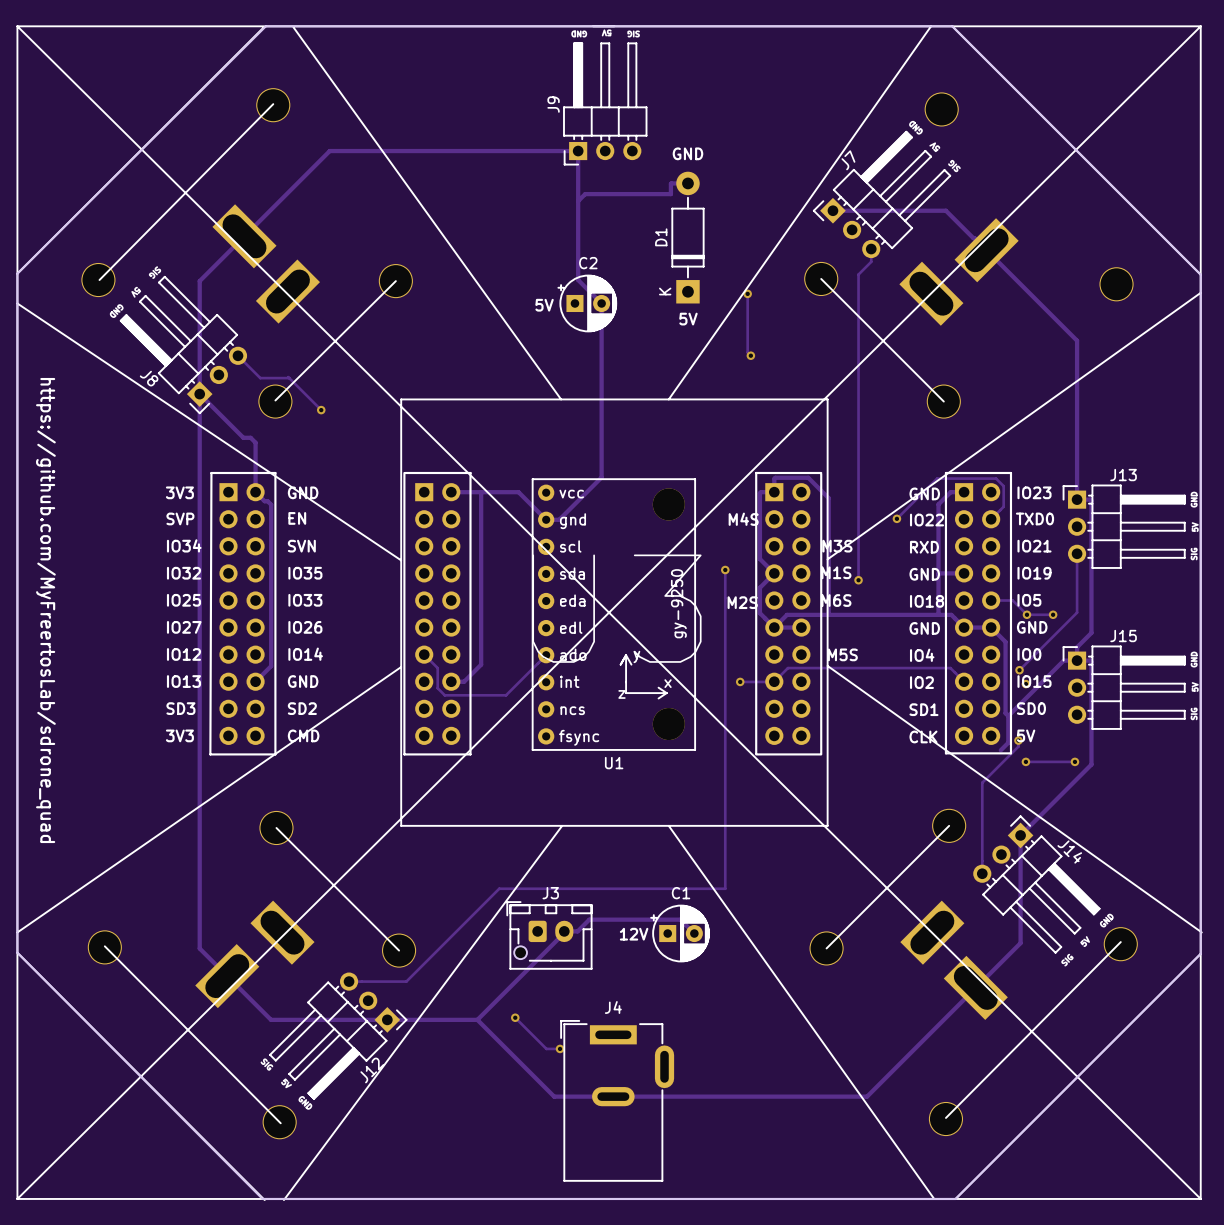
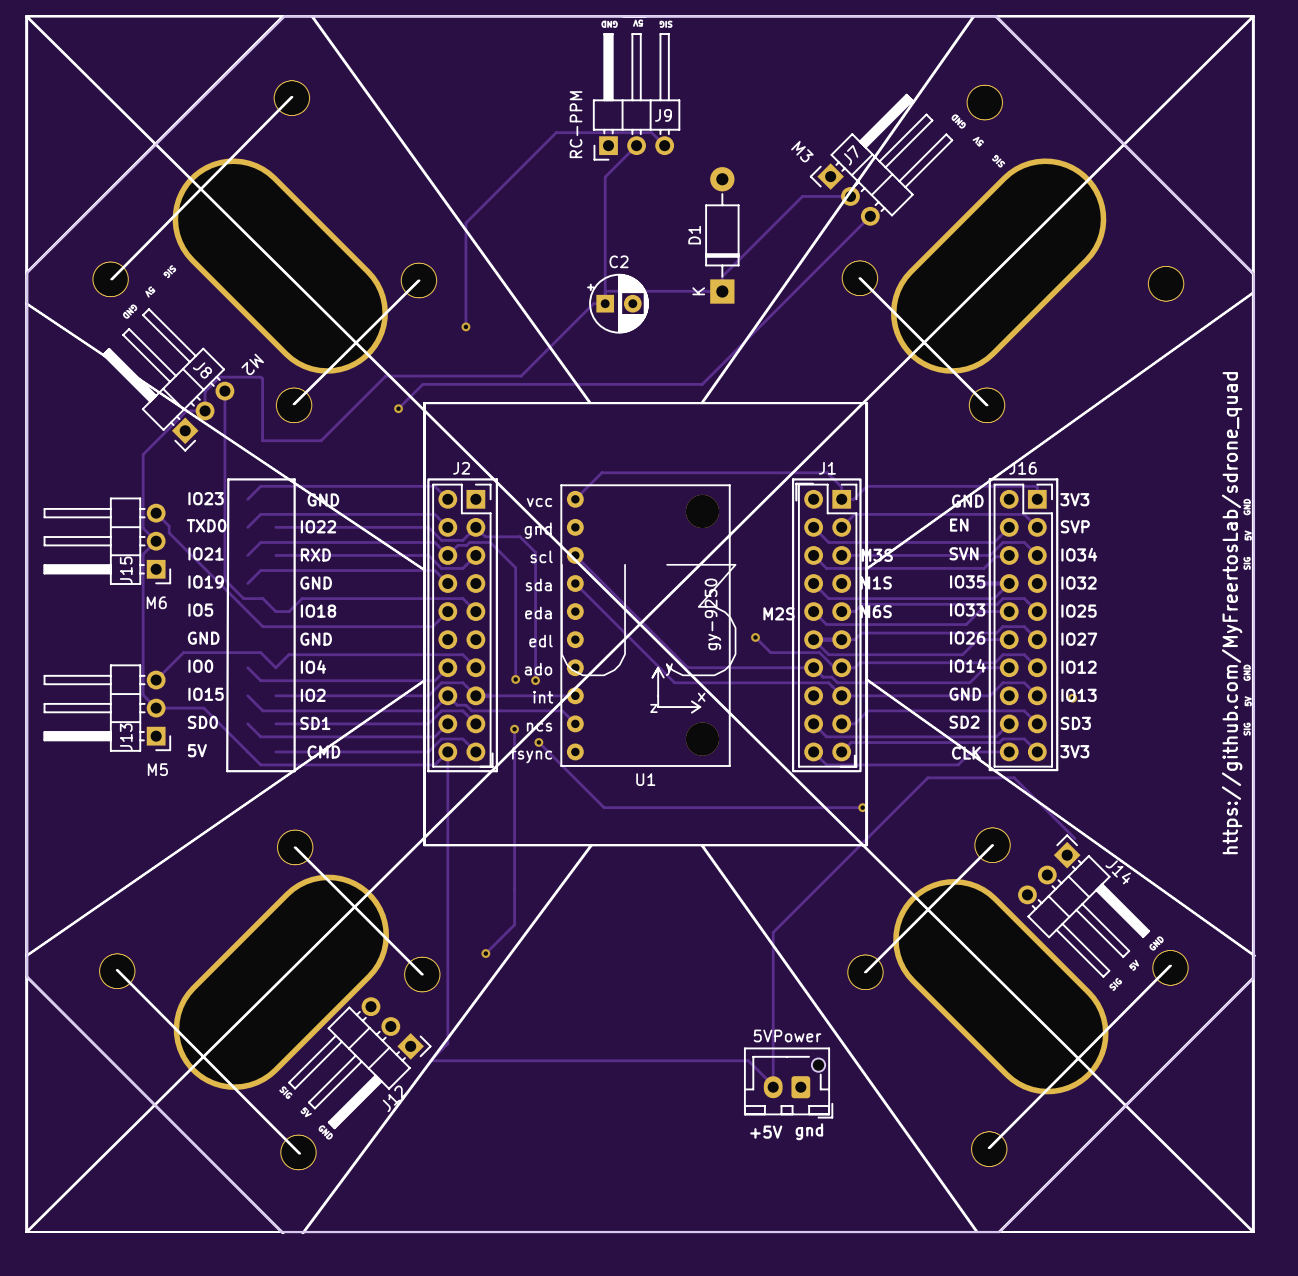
J9 name rotation: 0° (553, 104) -> 90° clockwise (663, 115)
J9 name position: J9 (553, 104) -> J9 (663, 115)
J9 value: none -> RC-PPM (576, 124)
track: (578, 151) (578, 280) (601, 303) (601, 477) (559, 519) (547, 519) -> none
track: (582, 151) (329, 151) (199, 281) (199, 948) (271, 1019) (477, 1019) -> none
track: none -> (636, 145) (605, 177) (605, 303) (593, 303) (521, 376) (385, 376) (321, 440) (262, 440) (262, 378) (260, 377) (219, 377) (205, 391) (205, 410) (186, 410) (143, 454) (143, 528) (156, 541) (143, 554) (143, 695) (156, 708) (203, 708) (260, 764) (434, 764) (447, 751) (447, 1043) (430, 1060) (748, 1060) (773, 1085)
track: none -> (664, 145) (651, 132) (556, 132) (465, 223) (465, 326)
text: GND (687, 153) -> none
J7 value: none -> M3 (802, 151)
J7 name position: J7 (848, 160) -> J7 (851, 155)
track: (687, 183) (671, 183) (670, 194) (585, 194) (578, 201) -> none
J7 position: (882, 194) -> (881, 159)
track: none -> (850, 196) (802, 196) (722, 276) (722, 291) (605, 292)
track: (832, 210) (945, 210) (1077, 340) (1077, 499) (1091, 500) (1091, 632) (1077, 647) (1077, 660) -> none
track: none -> (870, 216) (702, 384) (422, 384) (398, 408)
track: (871, 249) (871, 261) (858, 274) (858, 580) -> none
part: (266, 263) -> none
part: (959, 271) -> none
track: (747, 293) (747, 352) (750, 355) -> none
via: (747, 293) -> none
text: 5V (544, 305) -> none
text: 5V (688, 319) -> none
via: none -> (465, 326)
J8 position: (183, 345) -> (168, 379)
via: (750, 355) -> none
track: (232, 361) (238, 355) (260, 378) (289, 378) -> none
J8 value: none -> M2 (252, 364)
track: (288, 377) (321, 410) -> none
J8 name position: J8 (149, 378) -> J8 (202, 370)
track: none -> (224, 391) (224, 579) (243, 598) (262, 598) (275, 611) (289, 611) (302, 598) (462, 598) (475, 611)
track: (199, 394) (243, 437) (250, 437) (255, 442) (255, 492) (271, 504) (271, 666) (255, 681) -> none
via position: (321, 410) -> (398, 408)
J13 name position: J13 (1123, 475) -> J13 (126, 737)
line: none -> (812, 483) (796, 483) (796, 500)
U1 footprint: [531, 478, 696, 751] -> [560, 484, 731, 767]
text: 3V3 (179, 492) -> IO23 (206, 498)
track: none -> (247, 499) (260, 486) (434, 486) (447, 499)
track: (451, 492) (518, 492) (546, 519) -> none
track: (481, 492) (481, 664) (464, 681) -> (575, 695) (490, 695)
track: none -> (575, 499) (601, 472) (827, 472) (841, 487) (841, 499) (853, 499) (866, 486) (1036, 486) (1037, 499)
track: (964, 492) (950, 492) (938, 504) (938, 614) -> none
text: IO23 (1034, 492) -> 3V3 (1074, 499)
track: none -> (156, 513) (169, 526) (169, 532) (262, 626) (432, 626) (447, 611)
text: none -> EN (959, 525)
text: SVP (180, 518) -> TXD0 (206, 525)
text: EN (297, 518) -> IO22 (318, 526)
track: (896, 518) (937, 478) (996, 478) (1003, 486) (1003, 506) (991, 519) -> none
via: (896, 518) -> none
text: TXD0 (1035, 518) -> SVP (1075, 526)
track: none -> (247, 527) (260, 514) (434, 514) (447, 527)
track: none -> (275, 527) (428, 527) (441, 540) (462, 540) (475, 527) (485, 536) (519, 536) (535, 552) (535, 680)
text: M4S (743, 519) -> none
track: none -> (813, 527) (828, 542) (994, 542) (1009, 527)
track: none -> (841, 527) (854, 514) (1024, 514) (1037, 527)
text: IO22 (927, 520) -> none
J13 rotation: 0° (1124, 526) -> 180° (107, 708)
J13 position: (1124, 526) -> (107, 708)
text: IO34 (184, 545) -> IO21 (206, 553)
track: none -> (247, 555) (260, 542) (434, 542) (447, 555) (457, 545) (466, 545) (469, 542) (490, 542) (515, 567) (515, 679)
track: none -> (275, 555) (428, 555) (441, 568) (462, 568) (475, 555)
text: SVN (301, 546) -> RXD (315, 554)
track: none -> (575, 555) (687, 667) (813, 667) (823, 677) (831, 677) (837, 682) (969, 682) (984, 667) (1009, 667)
track: none -> (813, 555) (826, 568) (984, 568) (995, 556) (1009, 555)
track: none -> (841, 555) (990, 555) (1003, 542) (1024, 542) (1037, 555)
text: IO21 (1034, 546) -> IO34 (1079, 554)
text: RXD (924, 547) -> SVN (963, 553)
track: (1077, 553) (1077, 612) (1019, 670) -> none
track: (725, 570) (725, 888) (499, 888) (406, 981) (349, 981) -> none
via: (725, 570) -> none
text: IO32 (183, 573) -> IO19 (206, 582)
track: none -> (247, 583) (260, 570) (434, 570) (447, 583)
text: IO35 (305, 573) -> GND (316, 583)
track: none -> (575, 583) (674, 682) (828, 682) (841, 695) (990, 695) (1003, 682) (1024, 682) (1037, 695)
track: none -> (813, 583) (828, 598) (994, 598) (1009, 583)
text: IO19 (1034, 573) -> IO32 (1078, 583)
text: GND (924, 574) -> IO35 (967, 581)
via: (858, 580) -> none
J15 value: none -> M6 (156, 602)
text: IO25 (183, 600) -> IO5 (200, 610)
text: IO33 (305, 600) -> IO18 (318, 611)
track: none -> (813, 611) (826, 624) (966, 624) (979, 611) (1009, 611)
track: none -> (841, 611) (854, 611) (862, 604) (997, 604) (1003, 598) (1024, 598) (1037, 611)
track: (991, 600) (1012, 600) (1026, 614) (1053, 614) -> none
text: IO5 (1029, 600) -> IO25 (1078, 611)
text: IO18 (927, 601) -> IO33 (967, 609)
text: none -> https://github.com/MyFreertosLab/sdrone_quad (1232, 613)
text: https://github.com/MyFreertosLab/sdrone_quad (45, 610) -> none
part: none -> (640, 624)
part: (242, 614) -> none
J2: none -> (461, 625)
part: (437, 614) -> none
part: (787, 614) -> none
J1: none -> (827, 625)
track: (828, 614) (828, 498) (808, 477) (775, 477) (774, 492) (759, 493) (759, 559) (774, 573) (759, 587) (759, 613) (774, 627) (787, 614) (951, 614) (964, 627) -> (813, 639) (828, 654) (962, 654) (977, 639) (1008, 639)
part: (977, 614) -> none
J16: none -> (1023, 625)
via: (1026, 614) -> none
via: (1053, 614) -> none
track: none -> (755, 637) (770, 652) (819, 652) (834, 667) (854, 667) (859, 662) (995, 662) (1003, 654) (1024, 654) (1037, 667)
via: none -> (755, 637)
text: none -> IO26 (967, 638)
text: IO27 (184, 627) -> GND (203, 638)
text: IO26 (305, 627) -> GND (316, 639)
track: none -> (841, 639) (854, 639) (861, 633) (996, 633) (1003, 626) (1024, 626) (1037, 639)
track: (964, 627) (991, 627) (1005, 641) (1005, 713) (1008, 716) -> none
text: GND (1032, 627) -> IO27 (1079, 639)
text position: GND (924, 628) -> GND (965, 694)
J15 name position: J15 (1123, 636) -> J15 (126, 570)
text: IO12 (183, 654) -> IO0 (200, 666)
track: none -> (247, 667) (260, 680) (434, 680) (447, 667)
text: IO14 (305, 654) -> IO4 (313, 666)
track: (424, 654) (437, 668) (437, 688) (444, 695) (506, 695) (546, 655) -> none
track: none -> (475, 667) (462, 654) (288, 654) (275, 667) (260, 652) (183, 652) (156, 680)
text: M5S (842, 654) -> none
text: IO0 (1029, 654) -> IO12 (1078, 667)
text: IO4 (922, 655) -> IO14 (967, 665)
via: none -> (515, 679)
via: none -> (535, 680)
via: (1019, 670) -> none
text: IO13 (183, 681) -> IO15 (206, 694)
track: none -> (247, 695) (262, 710) (432, 710) (447, 695) (457, 705) (466, 705) (471, 710) (562, 710) (575, 723)
track: none -> (275, 695) (428, 695) (441, 682) (462, 682) (476, 695)
text: GND (303, 681) -> IO2 (313, 695)
via: (740, 681) -> none
track: (964, 681) (950, 668) (787, 668) (774, 681) (740, 681) -> none
text: IO15 (1034, 681) -> IO13 (1078, 695)
text: IO2 (921, 682) -> none
J15 rotation: 0° (1124, 687) -> 180° (107, 541)
J15 position: (1124, 687) -> (107, 541)
text: SD3 (180, 708) -> SD0 (202, 722)
track: none -> (247, 723) (260, 736) (434, 736) (447, 723)
track: none -> (275, 723) (428, 723) (441, 710) (462, 710) (475, 723)
text: SD2 (302, 708) -> SD1 (315, 723)
track: none -> (813, 723) (826, 736) (996, 736) (1009, 723)
track: none -> (841, 723) (854, 723) (867, 710) (1024, 710) (1037, 723)
text: SD0 (1031, 708) -> SD3 (1075, 723)
text: SD1 (923, 709) -> SD2 (964, 722)
track: none -> (514, 729) (514, 924) (485, 953)
via: none -> (514, 729)
track: (1008, 716) (1063, 660) (1091, 661) (1091, 764) (1020, 835) (1020, 943) (867, 1096) (554, 1096) (477, 1019) -> none
track: (1008, 716) (1008, 742) (1000, 750) -> none
track: none -> (538, 742) (604, 807) (862, 807)
via: none -> (538, 742)
text: 3V3 (179, 735) -> 5V (197, 750)
track: none -> (275, 751) (428, 751) (441, 738) (462, 738) (475, 751)
track: none -> (813, 751) (826, 764) (958, 764) (971, 751) (1009, 751)
track: none -> (841, 751) (851, 742) (999, 742) (1003, 738) (1024, 738) (1037, 751)
text: 5V (1026, 735) -> 3V3 (1074, 751)
line: none -> (492, 753) (492, 766) (480, 766)
line: none -> (854, 755) (854, 766) (840, 766)
track: (1018, 740) (1018, 746) (982, 782) (982, 873) -> none
via: (1018, 740) -> none
J13 value: none -> M5 (157, 769)
track: (1025, 761) (1074, 761) -> none
via: (1025, 761) -> none
via: (1074, 761) -> none
via: none -> (862, 807)
track: none -> (1074, 838) (1014, 777) (927, 777) (773, 932) (773, 1087)
via: none -> (485, 953)
C1: (680, 933) -> none
track: (694, 933) (680, 919) (589, 919) (577, 931) (564, 931) (477, 1019) -> none
text: 12V (634, 934) -> none
J3: (549, 935) -> none
part: (254, 954) -> none
part: (954, 960) -> none
track: (515, 1017) (546, 1048) (560, 1048) -> none
via: (515, 1017) -> none
via: (560, 1048) -> none
part: none -> 5VPower (788, 1083)
J4: (617, 1100) -> none
text: none -> +5V (766, 1132)
text: none -> gnd (809, 1131)

